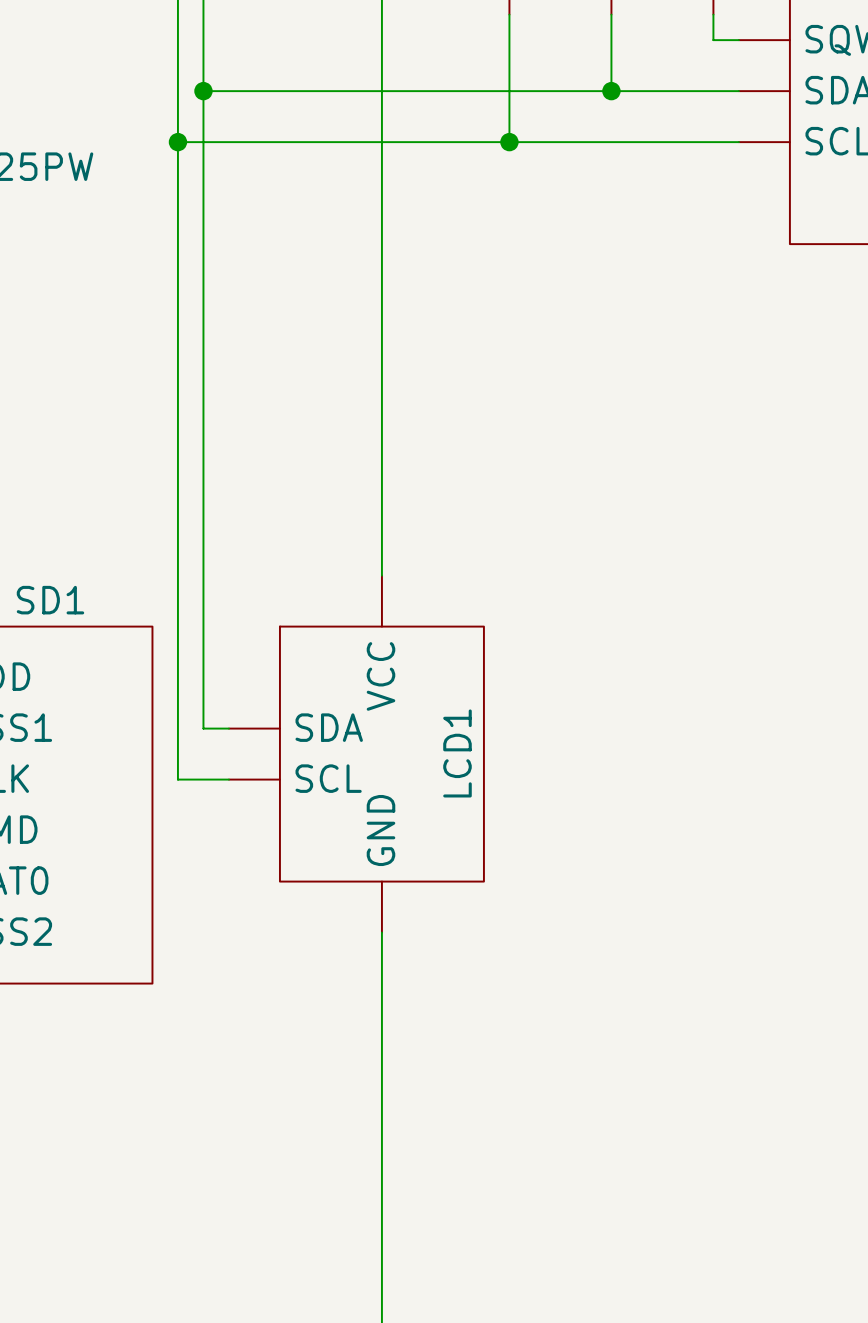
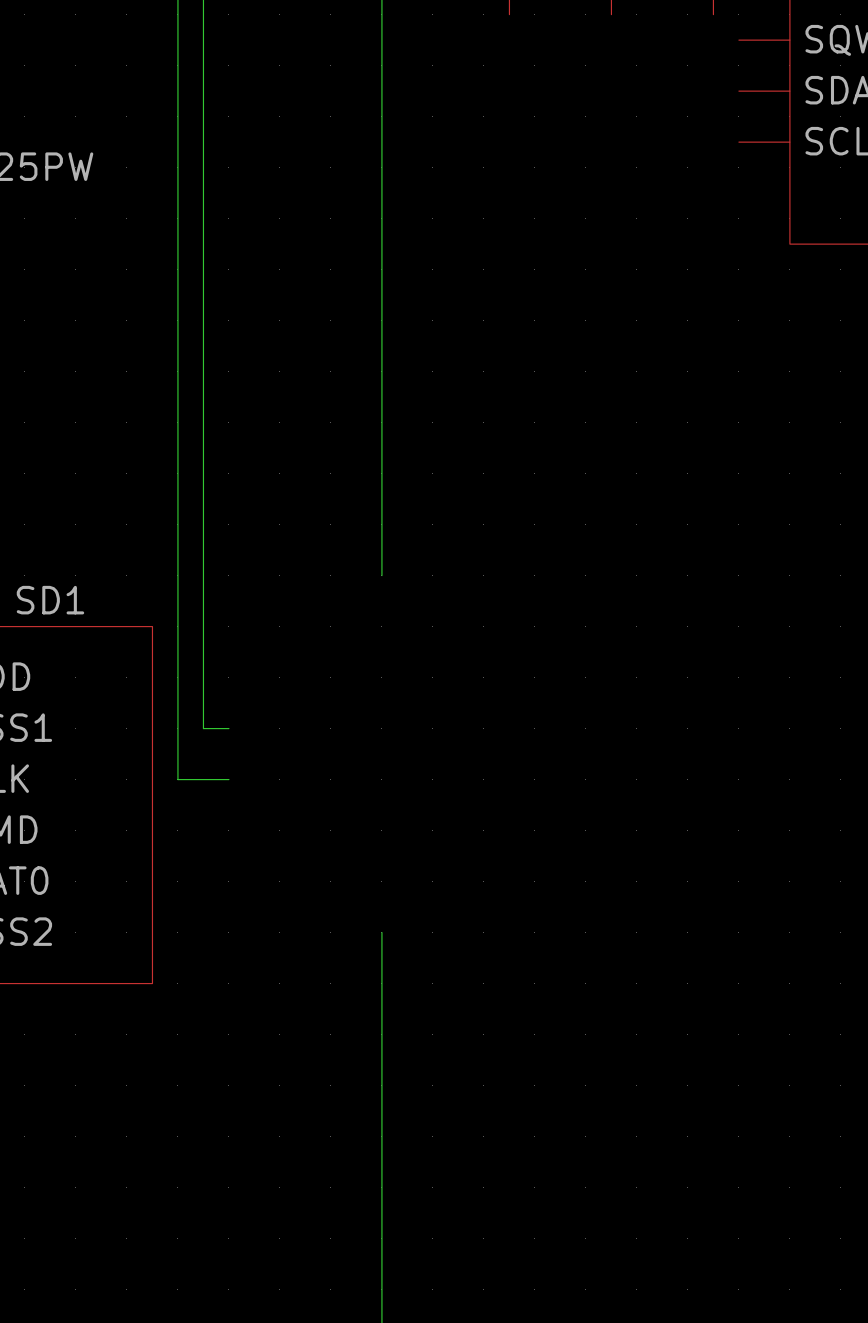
wire: (509, 14) (509, 142) -> none
wire: (611, 14) (611, 91) -> none
wire: (713, 14) (713, 40) (738, 40) -> none
wire: (203, 91) (738, 91) -> none
junction: (203, 91) -> none
junction: (611, 91) -> none
wire: (177, 142) (738, 142) -> none
junction: (177, 142) -> none
junction: (509, 142) -> none
LCD1: (356, 754) -> none

